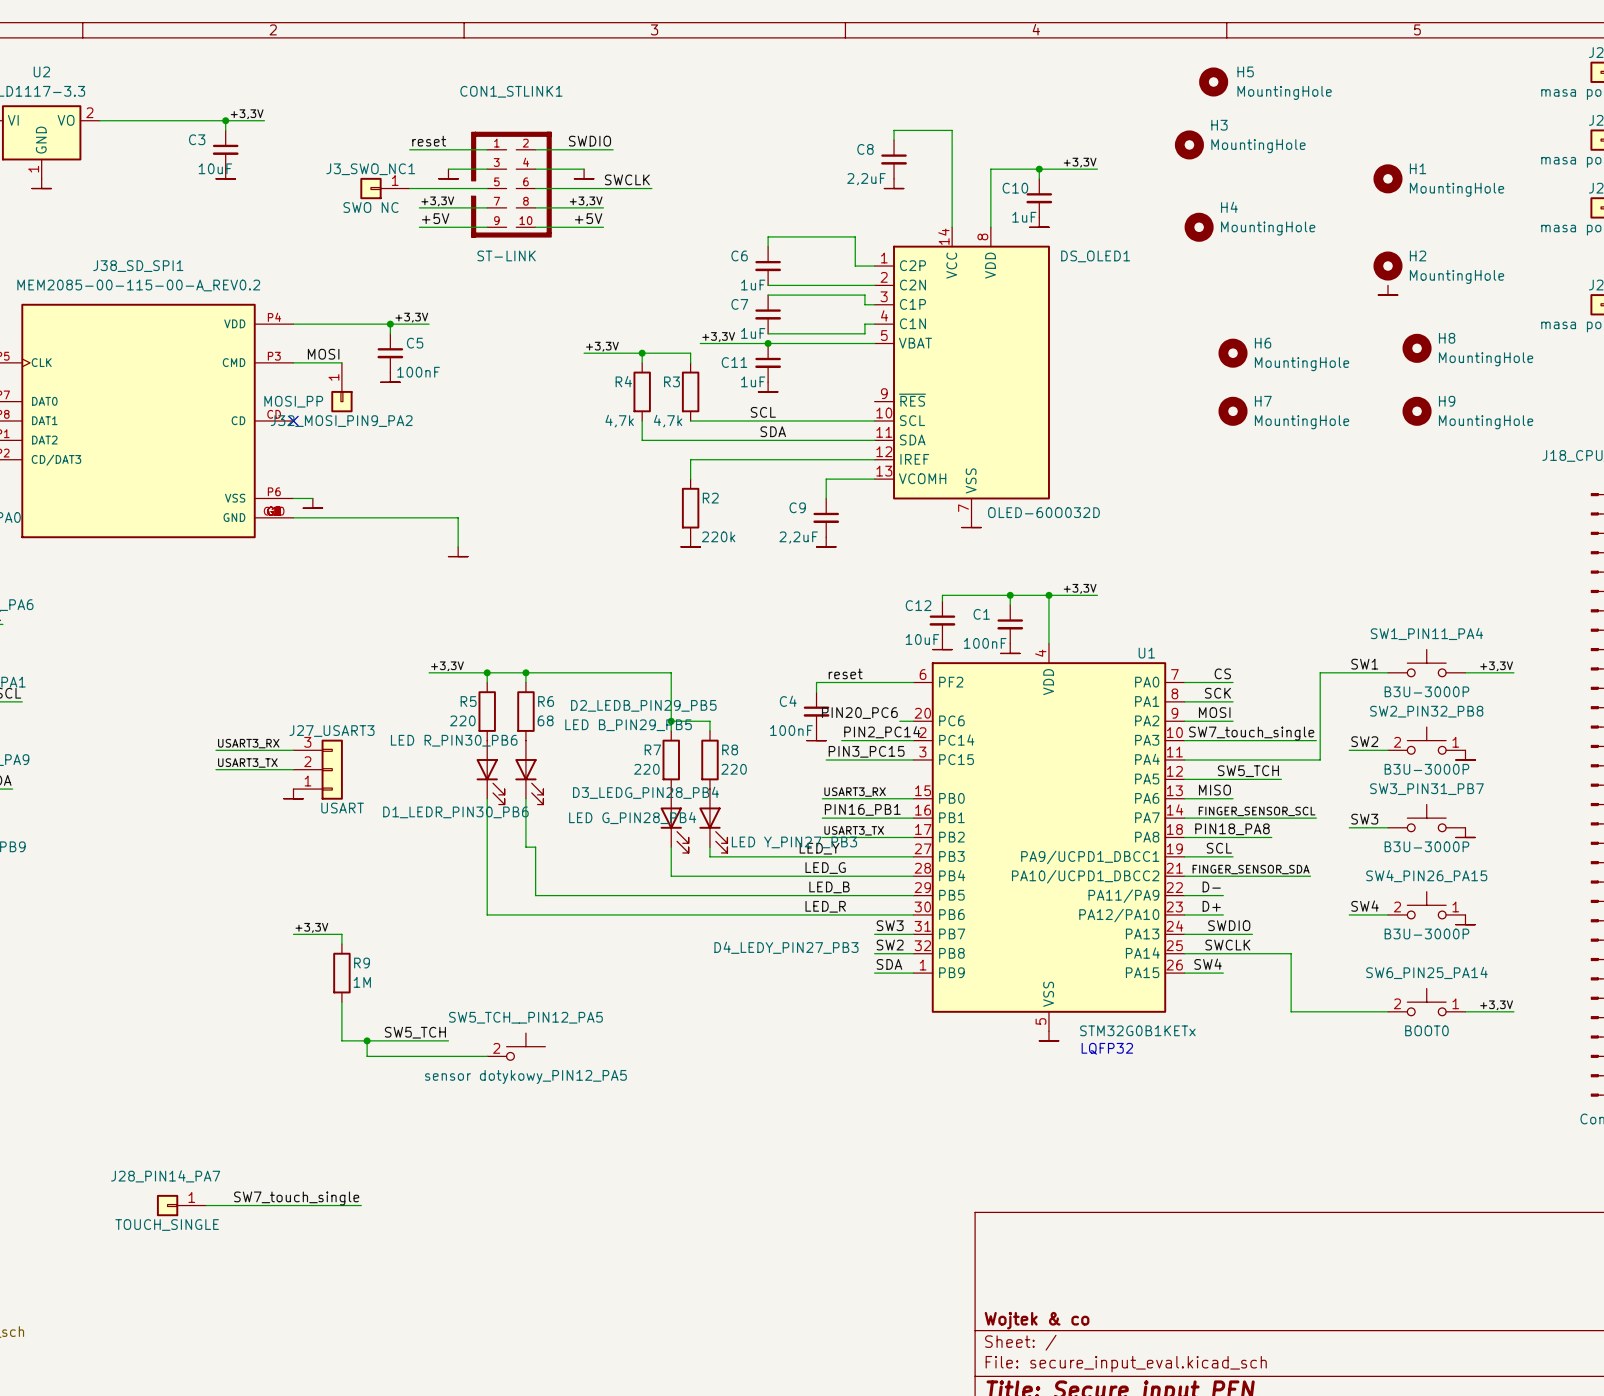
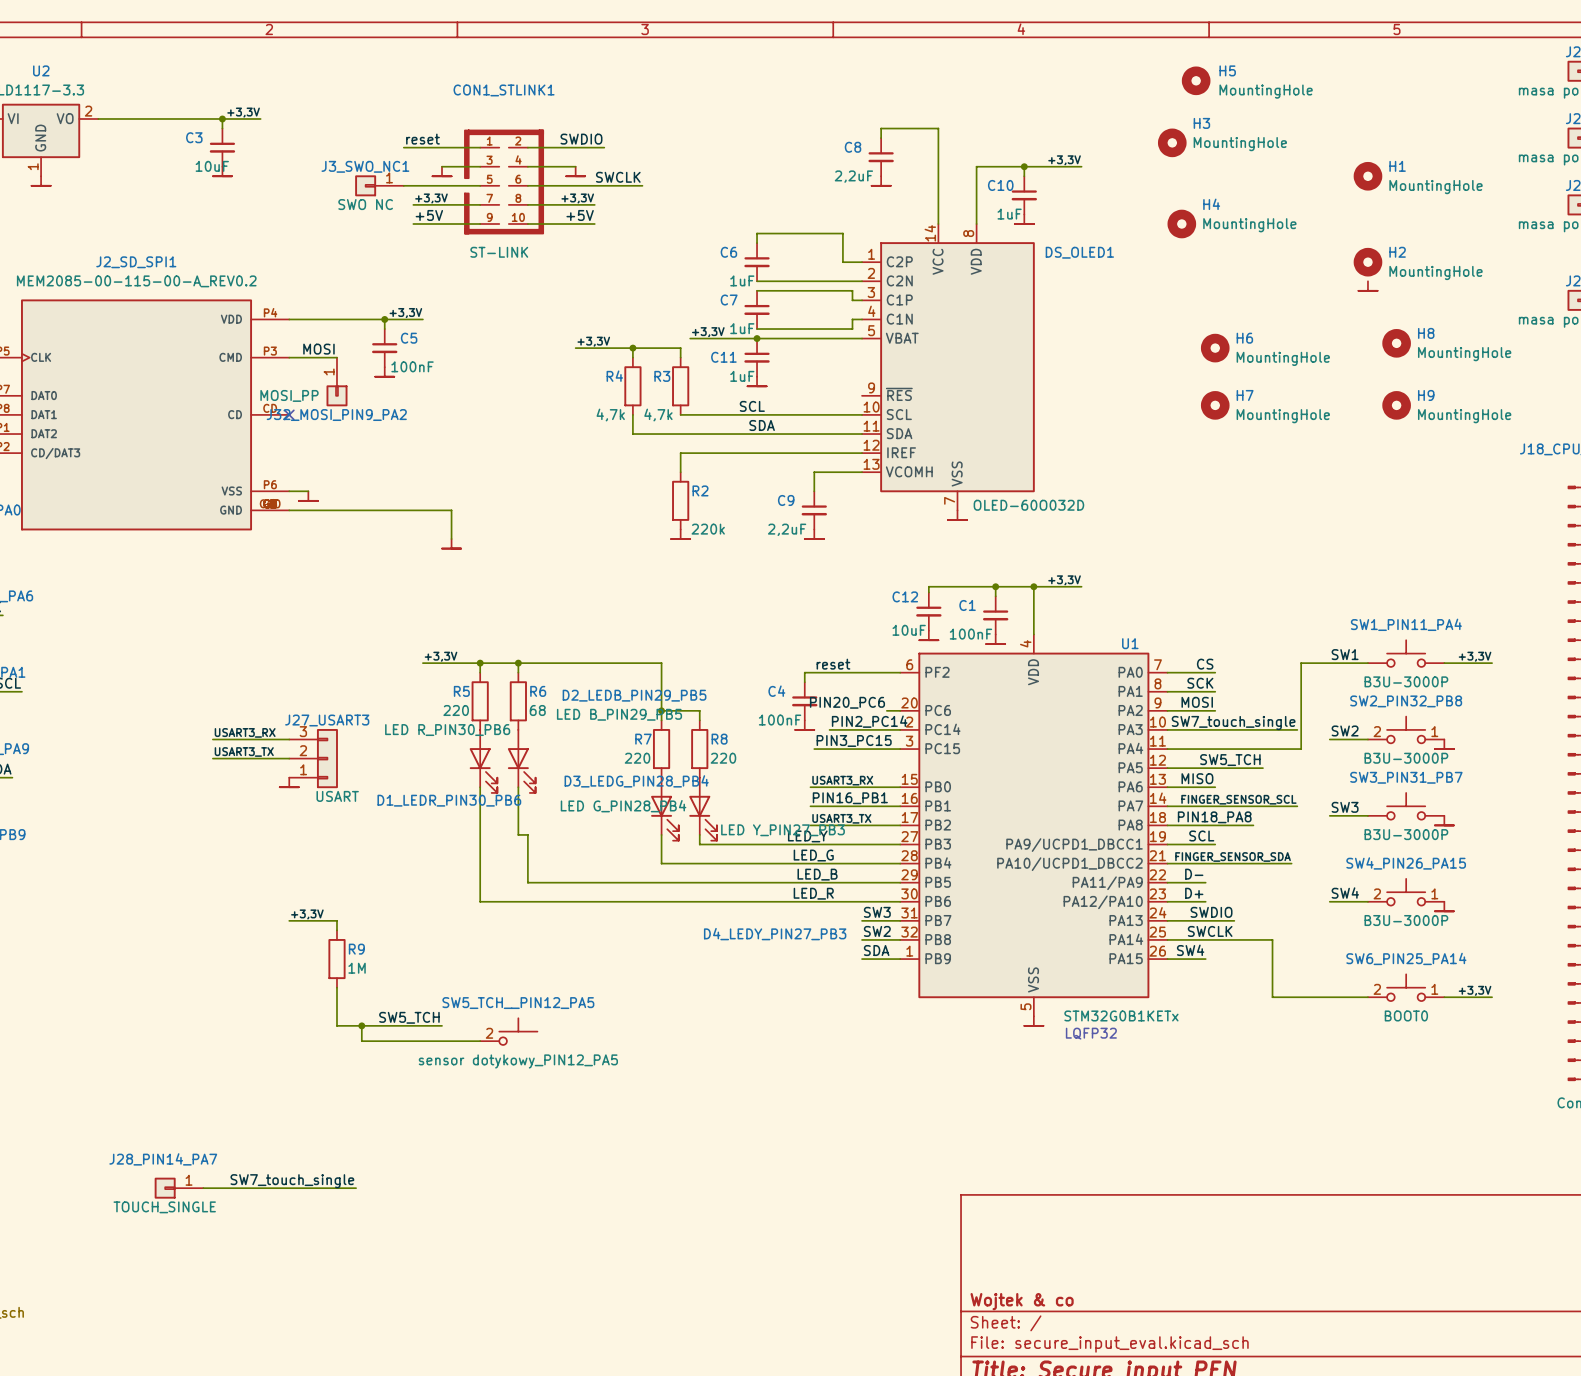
J38_SD_SPI1 name: J38_SD_SPI1 (138, 266) -> J2_SD_SPI1 (136, 262)

